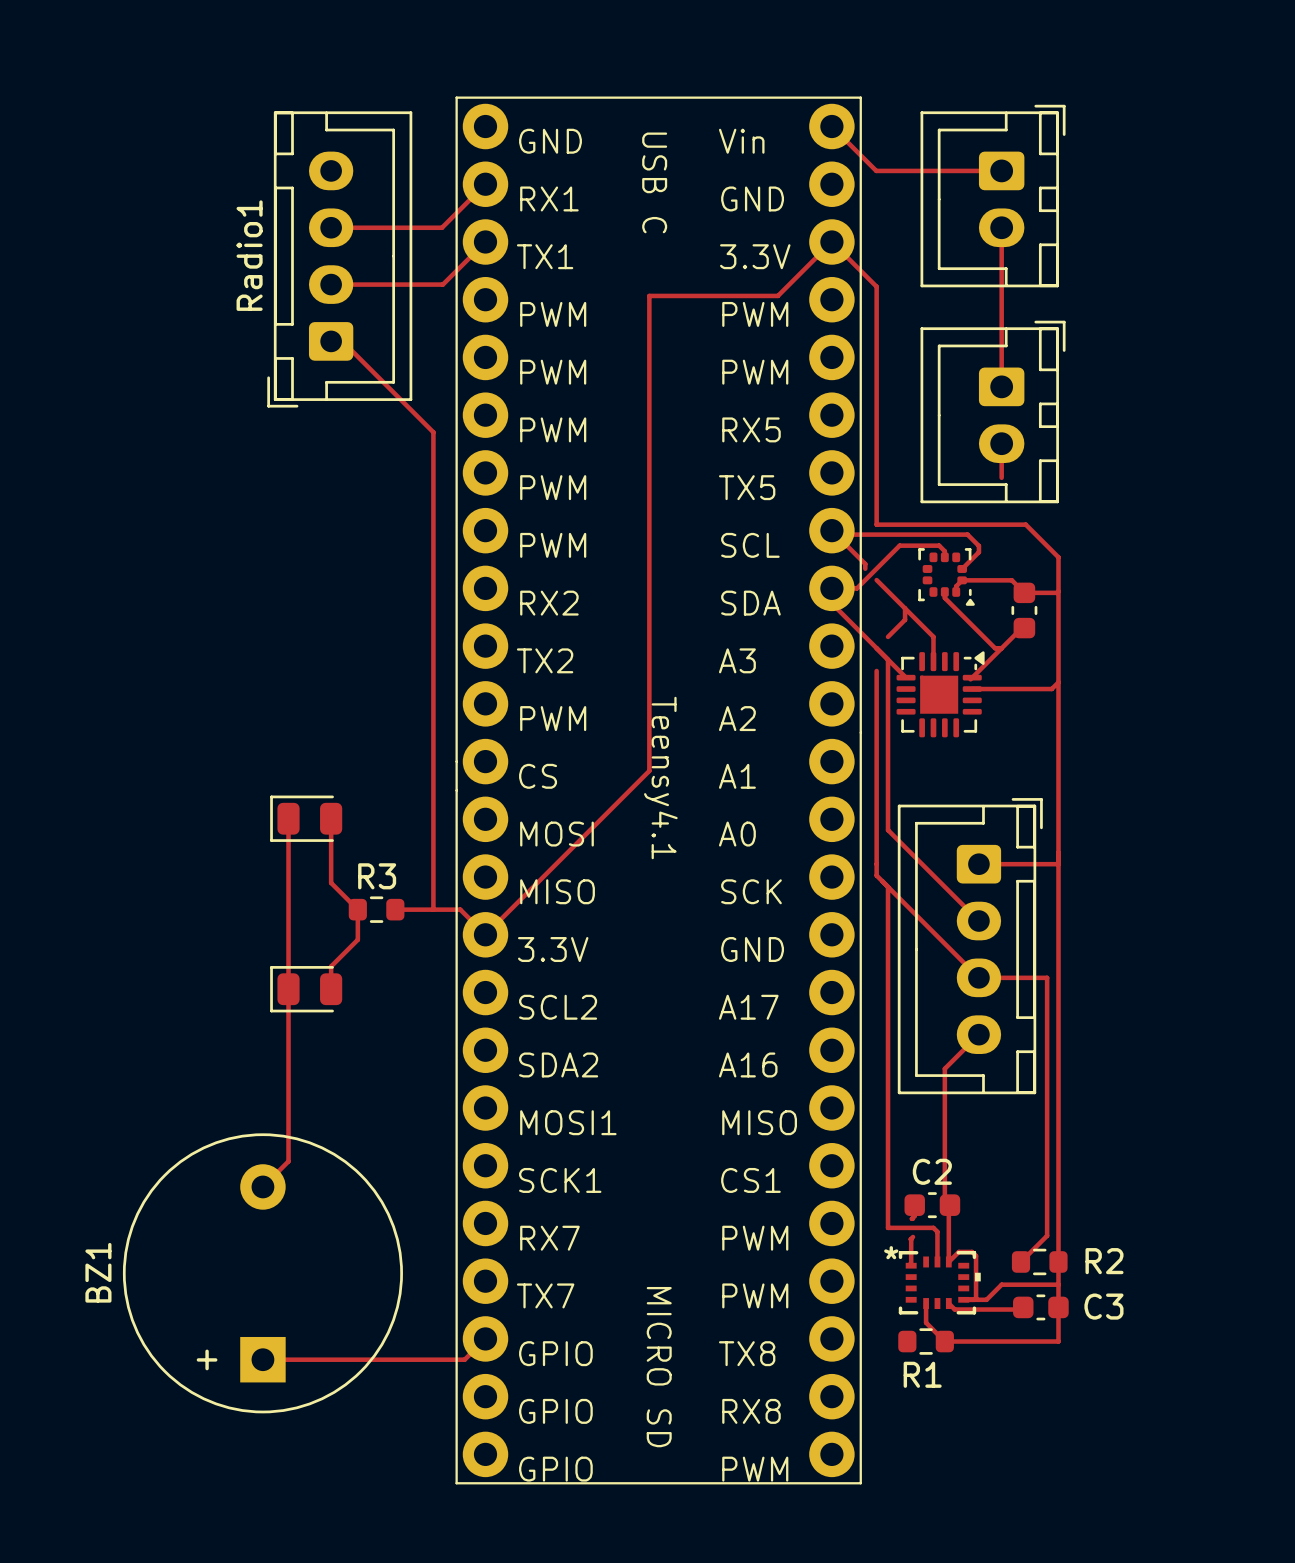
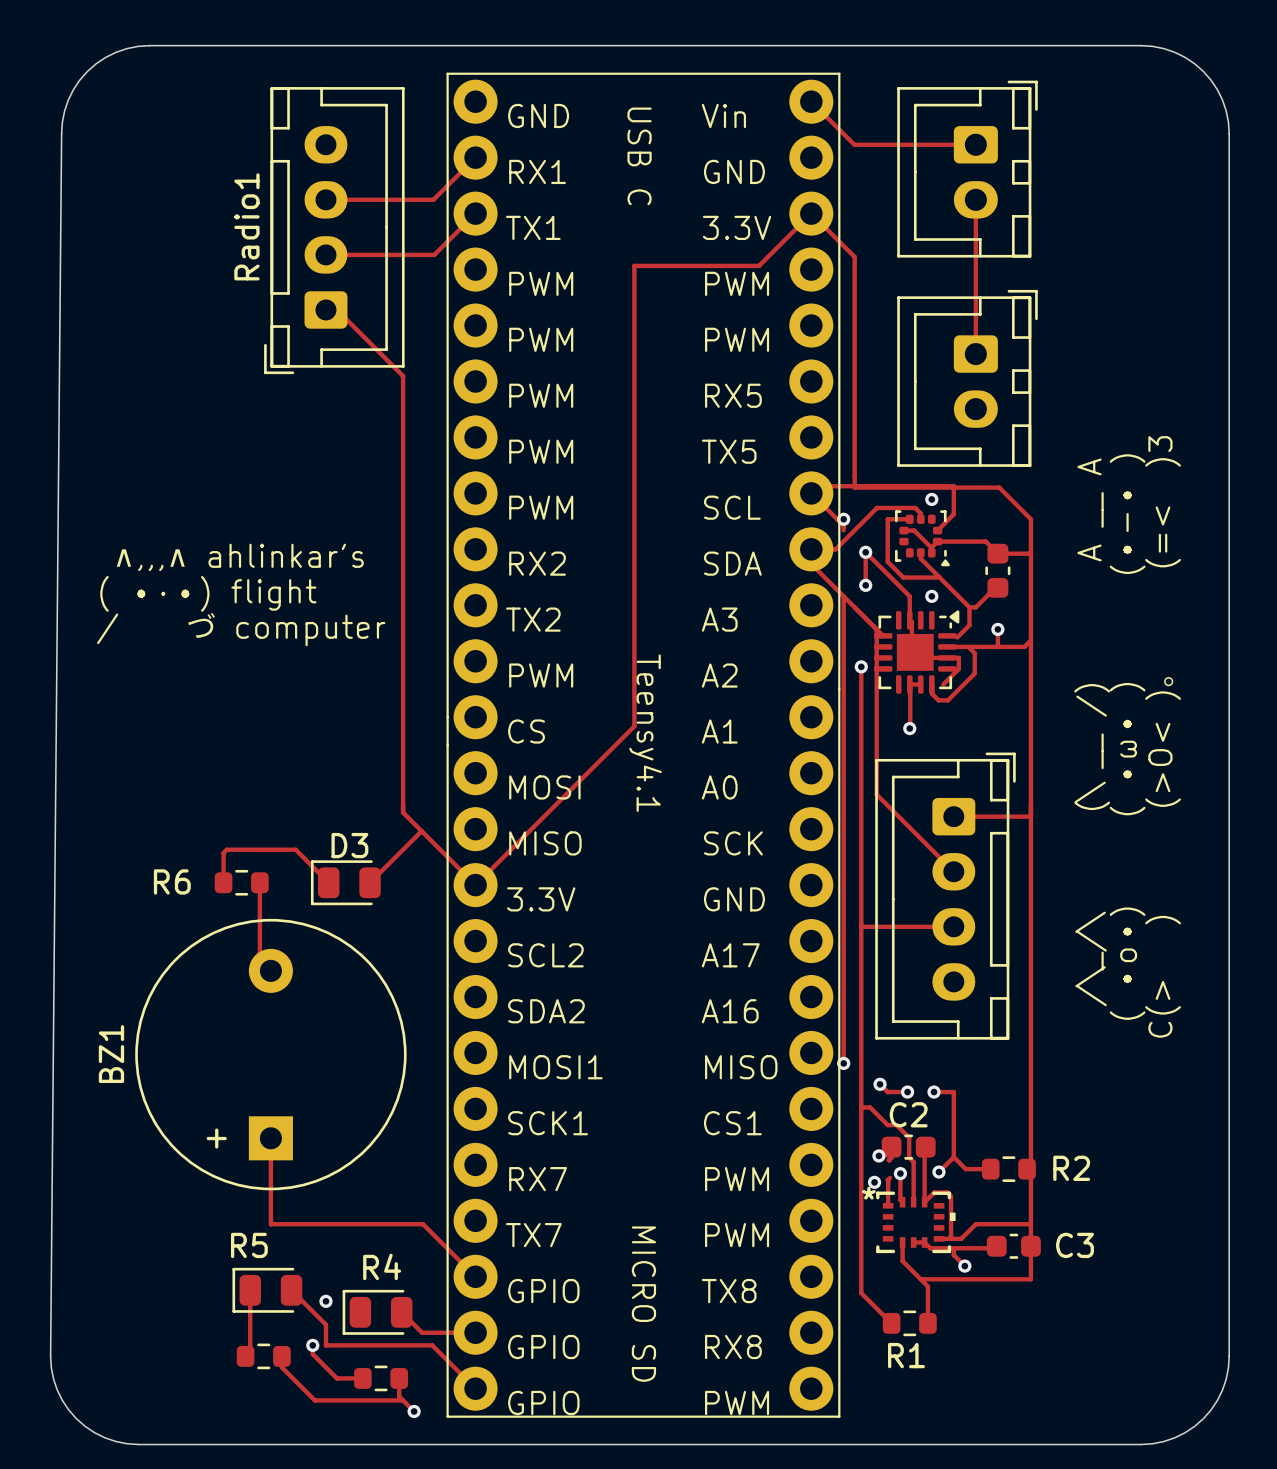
board edge: none -> (149, 45) (1141, 45) (1163, 48) (1185, 57) (1203, 71) (1211, 80) (1222, 100) (1226, 110) (1229, 133) (1229, 1356) (1226, 1379) (1222, 1390) (1211, 1410) (1194, 1426) (1174, 1437) (1163, 1441) (1141, 1444) (138, 1444) (115, 1441) (94, 1432) (76, 1418) (68, 1410) (57, 1390) (53, 1379) (50, 1356) (61, 133) (64, 110) (68, 100) (79, 80) (87, 71) (105, 57) (116, 52) (138, 46) (149, 45)
track: (410, 409) (433, 432) (433, 909) -> (403, 376) (403, 812) (451, 860)
track: (1001, 443) (1001, 477) -> none
track: (835, 534) (967, 534) (978, 545) -> (811, 493) (818, 486) (953, 486) (953, 508)
via: none -> (931, 499)
via: none -> (843, 519)
track: none -> (909, 519) (887, 519) (887, 561) (903, 577) (939, 577)
track: none -> (903, 530) (914, 530) (931, 548)
track: (876, 580) (888, 591) -> (865, 585) (865, 552)
via: none -> (865, 552)
text: none -> ∧,,,∧ ahlinkar's (239, 557)
track: (905, 608) (905, 619) (888, 636) -> none
via: none -> (865, 585)
text: none -> ( •·•) flight (208, 593)
track: none -> (843, 596) (843, 1063)
via: none -> (931, 596)
track: none -> (969, 607) (969, 625) (957, 637)
track: (1001, 648) (970, 679) -> none
track: (888, 659) (888, 830) (899, 841) -> (876, 629) (876, 794)
track: none -> (910, 620) (911, 637)
text: none -> / づ computer (241, 629)
track: (876, 670) (876, 875) (978, 977) (1047, 977) (1047, 1235) (1020, 1261) -> none
track: none -> (997, 629) (997, 646)
via: none -> (997, 629)
track: none -> (910, 636) (932, 657) (958, 657) (958, 668) (943, 684)
track: none -> (968, 646) (974, 653) (974, 673) (948, 700) (938, 700) (932, 694) (932, 684)
track: none -> (861, 666) (861, 1293) (891, 1323)
via: none -> (861, 666)
track: none -> (921, 684) (910, 684) (909, 728)
via: none -> (909, 728)
text: none -> /\_/\ (\ __ /) A __ A (1092, 732)
text: none -> C(> ) (>O< )｡ (=< )3 (1163, 736)
text: none -> ( •o•) ( •ω• ) (•-• ) (1127, 737)
track: (288, 818) (288, 1161) (262, 1186) -> none
part: (306, 818) -> none
track: (331, 818) (331, 882) (357, 909) (357, 939) (331, 966) (331, 989) -> none
track: none -> (421, 831) (370, 882)
track: (888, 886) (888, 1227) (933, 1227) (937, 1231) -> (861, 1107) (870, 1107) (887, 1125) (896, 1125) (909, 1137) (909, 1157) (913, 1162) (913, 1173)
R3: (376, 909) -> none
track: (395, 909) (460, 909) -> none
track: none -> (223, 882) (223, 853) (226, 849) (295, 849) (328, 882)
R6: none -> (241, 882)
track: none -> (259, 882) (259, 959) (270, 970)
D3: none -> (345, 882)
track: none -> (861, 926) (953, 926)
part: (306, 989) -> none
track: (978, 1034) (944, 1068) (944, 1207) -> none
via: none -> (843, 1063)
track: none -> (880, 1084) (887, 1092) (907, 1092)
via: none -> (880, 1084)
via: none -> (907, 1092)
track: none -> (931, 1092) (953, 1092) (953, 1157)
via: none -> (934, 1092)
via: none -> (878, 1155)
track: none -> (953, 1157) (938, 1172)
track: none -> (953, 1157) (965, 1169) (990, 1169)
via: none -> (938, 1172)
track: none -> (900, 1173) (900, 1200) (902, 1202)
via: none -> (900, 1173)
via: none -> (874, 1182)
R2 position: (1039, 1261) -> (1008, 1169)
BZ1 position: (262, 1273) -> (270, 1054)
track: none -> (913, 1242) (924, 1242)
track: none -> (953, 1248) (953, 1255) (964, 1266)
via: none -> (964, 1266)
track: (485, 1338) (464, 1359) (262, 1359) -> (475, 1276) (423, 1224) (270, 1224) (270, 1138)
R1 position: (926, 1341) -> (909, 1323)
track: none -> (920, 1279) (927, 1286) (927, 1323)
track: none -> (250, 1290) (250, 1351) (245, 1356)
part: none -> (267, 1290)
track: none -> (291, 1290) (325, 1324) (325, 1345) (432, 1345) (475, 1388)
via: none -> (325, 1301)
part: none -> (377, 1312)
track: none -> (401, 1312) (422, 1332) (475, 1332)
track: none -> (312, 1345) (312, 1354) (337, 1378) (362, 1378)
via: none -> (312, 1345)
R5: none -> (263, 1356)
track: none -> (281, 1356) (281, 1367) (314, 1400) (403, 1400)
R4: none -> (381, 1378)
track: none -> (399, 1378) (399, 1396) (414, 1411)
via: none -> (414, 1411)

